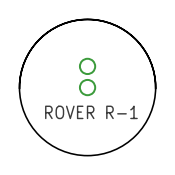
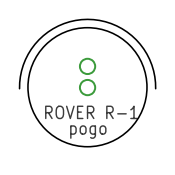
round board edge size: [19, 19, 156, 156] -> [27, 27, 148, 147]
text: none -> pogo (88, 132)

